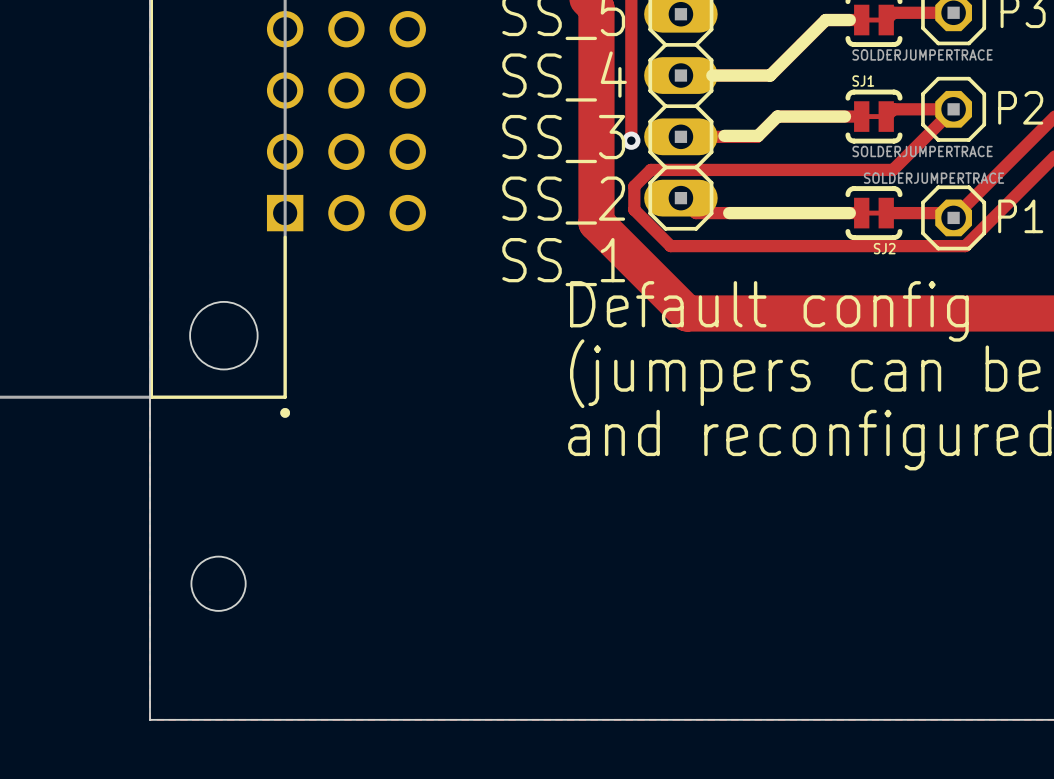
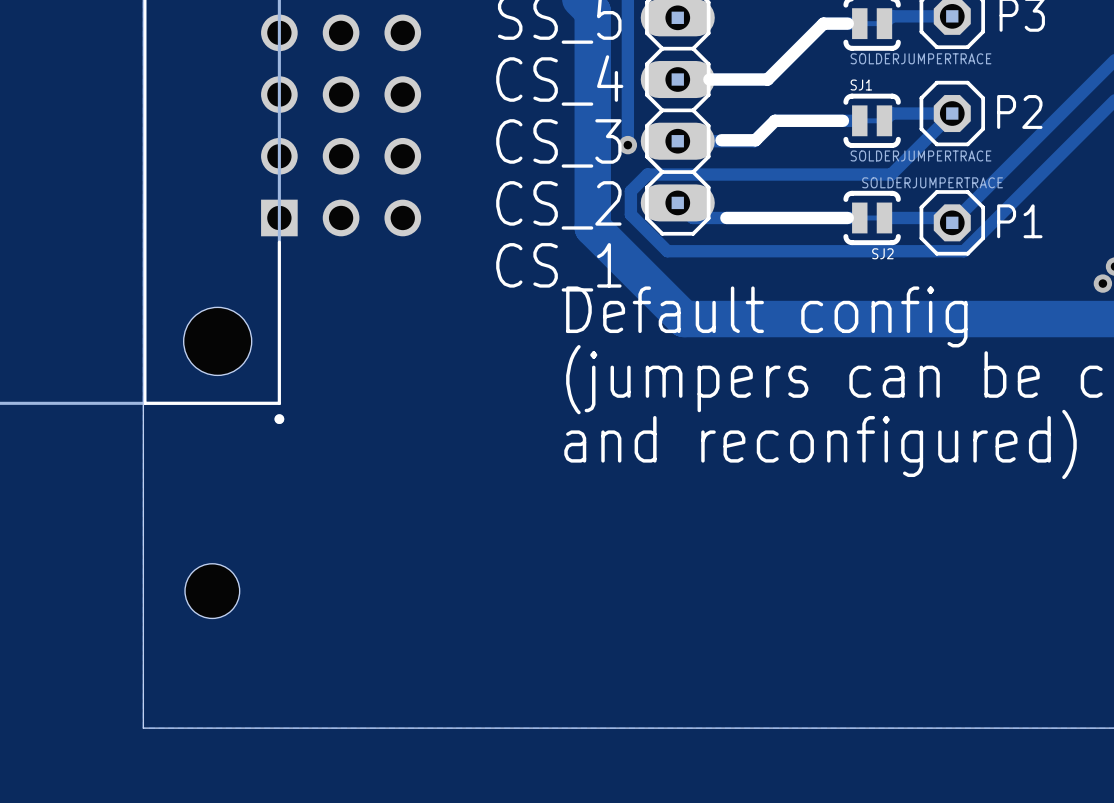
text: SS_4 (564, 76) -> CS_4 (559, 80)
text: SS_3 (563, 139) -> CS_3 (558, 143)
text: SS_2 (563, 200) -> CS_2 (558, 205)
text: SS_1 (563, 262) -> CS_1 (558, 267)

